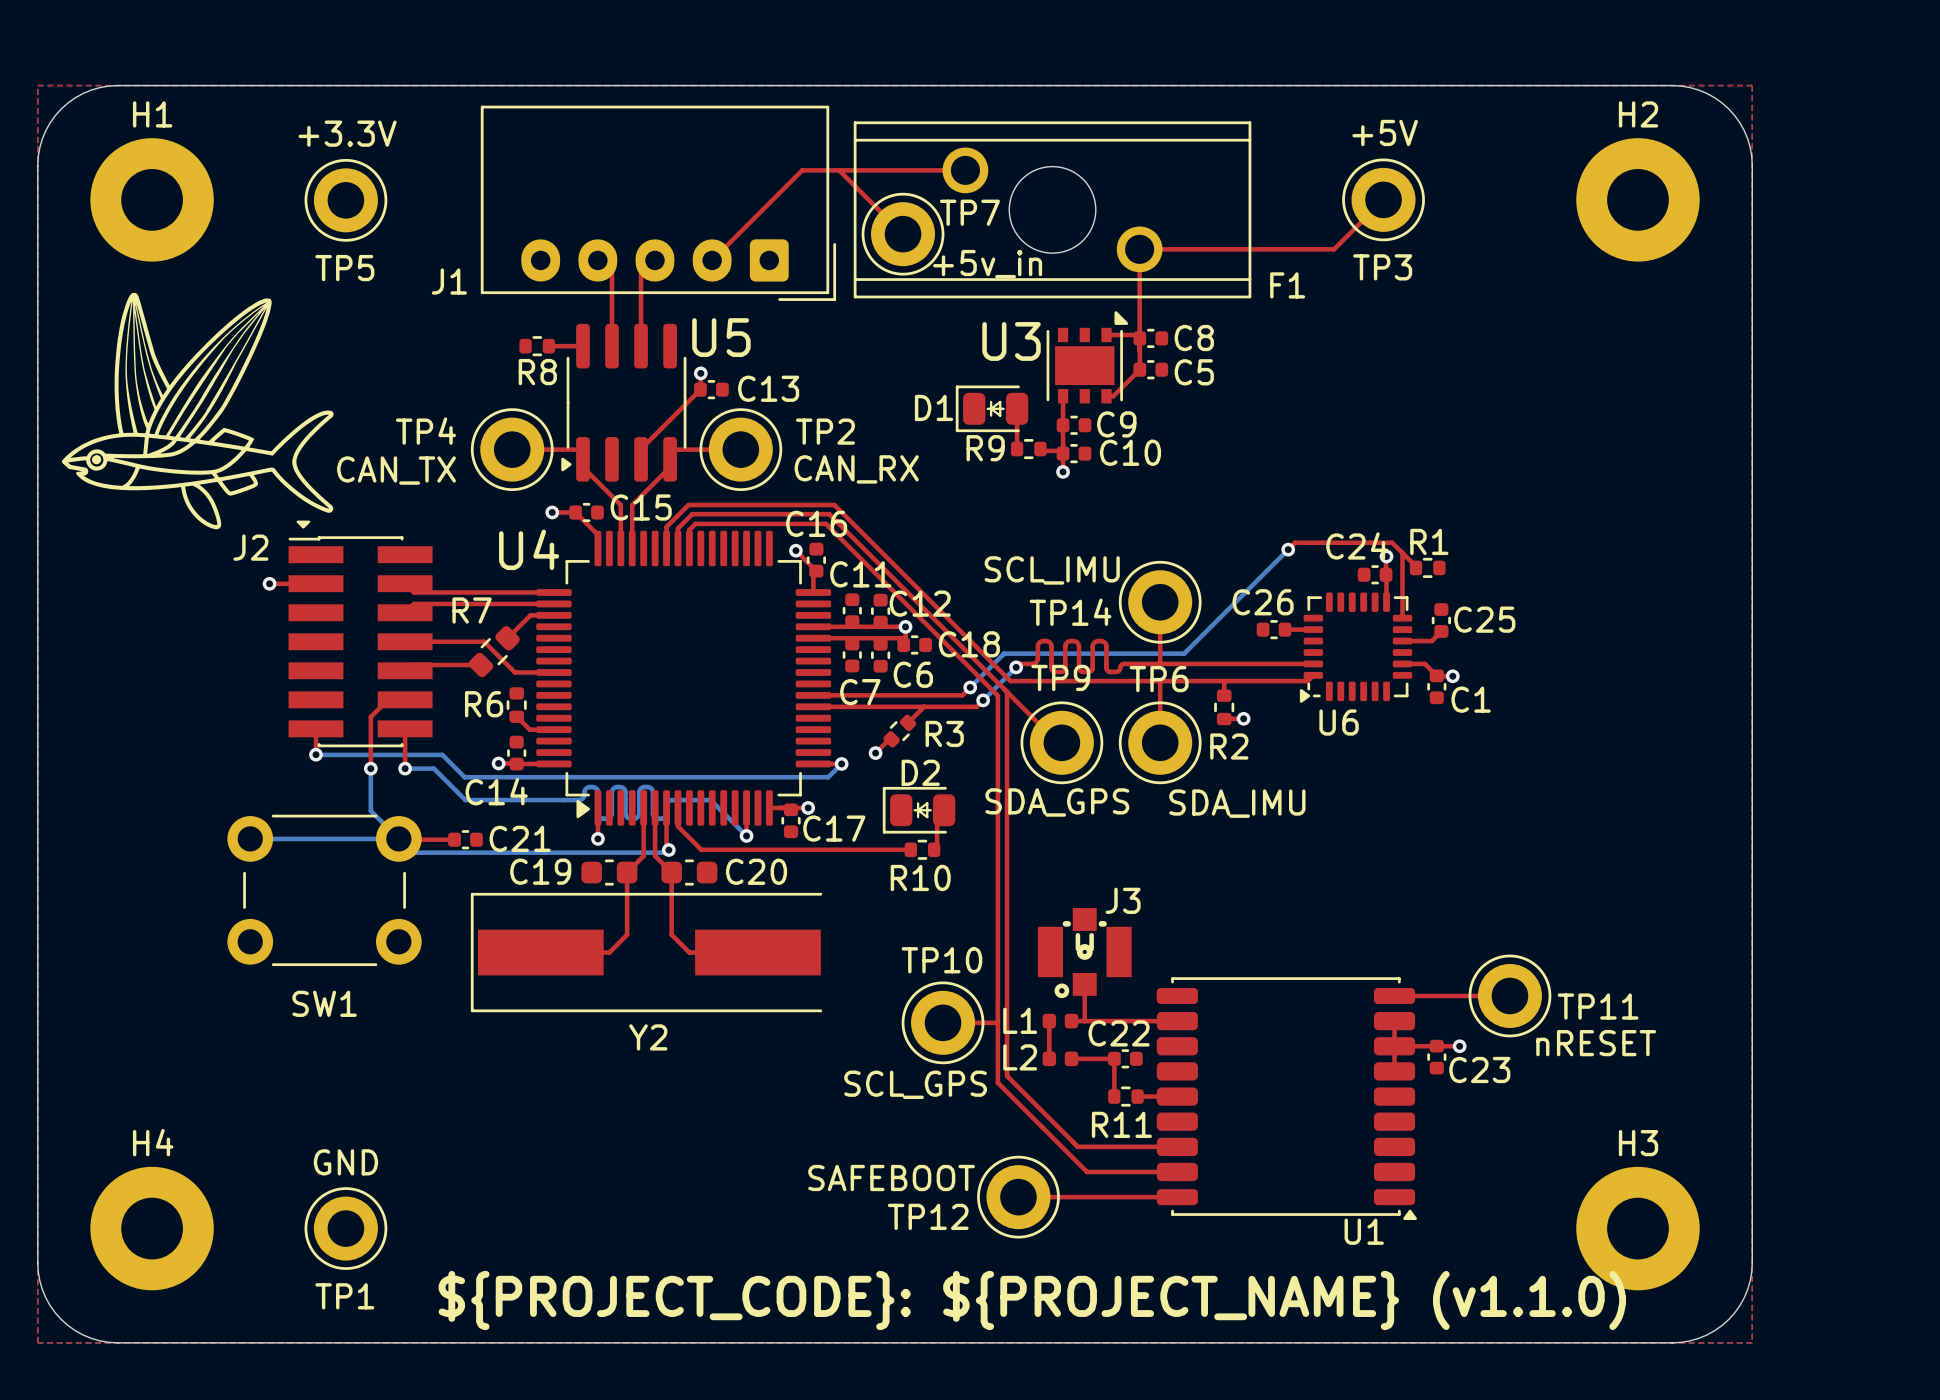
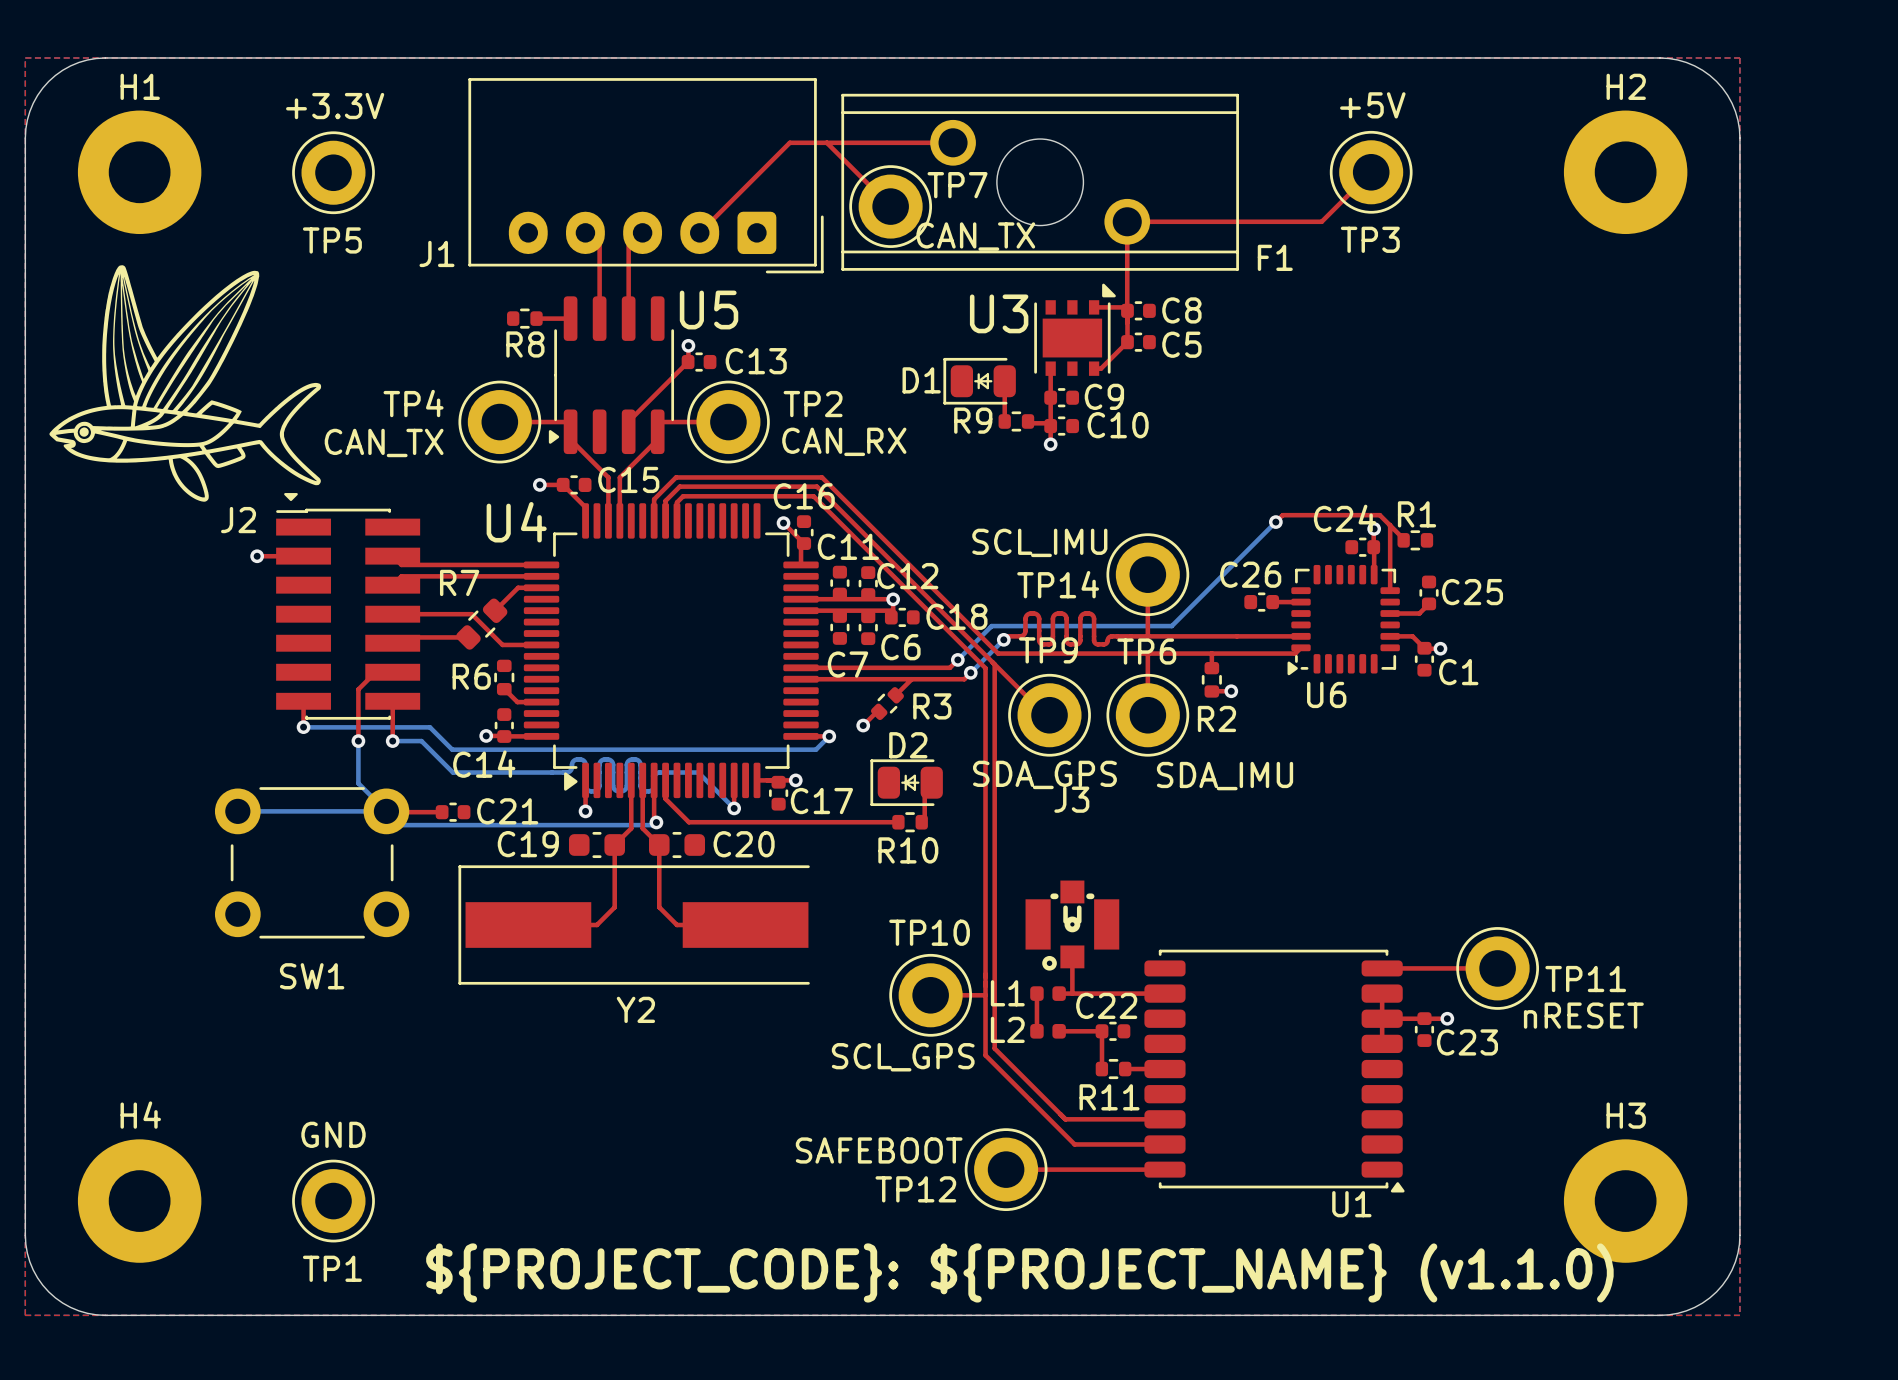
TP7 text: +5v_in (987, 264) -> CAN_TX (975, 236)
J3 name position: J3 (1123, 900) -> J3 (1071, 799)

